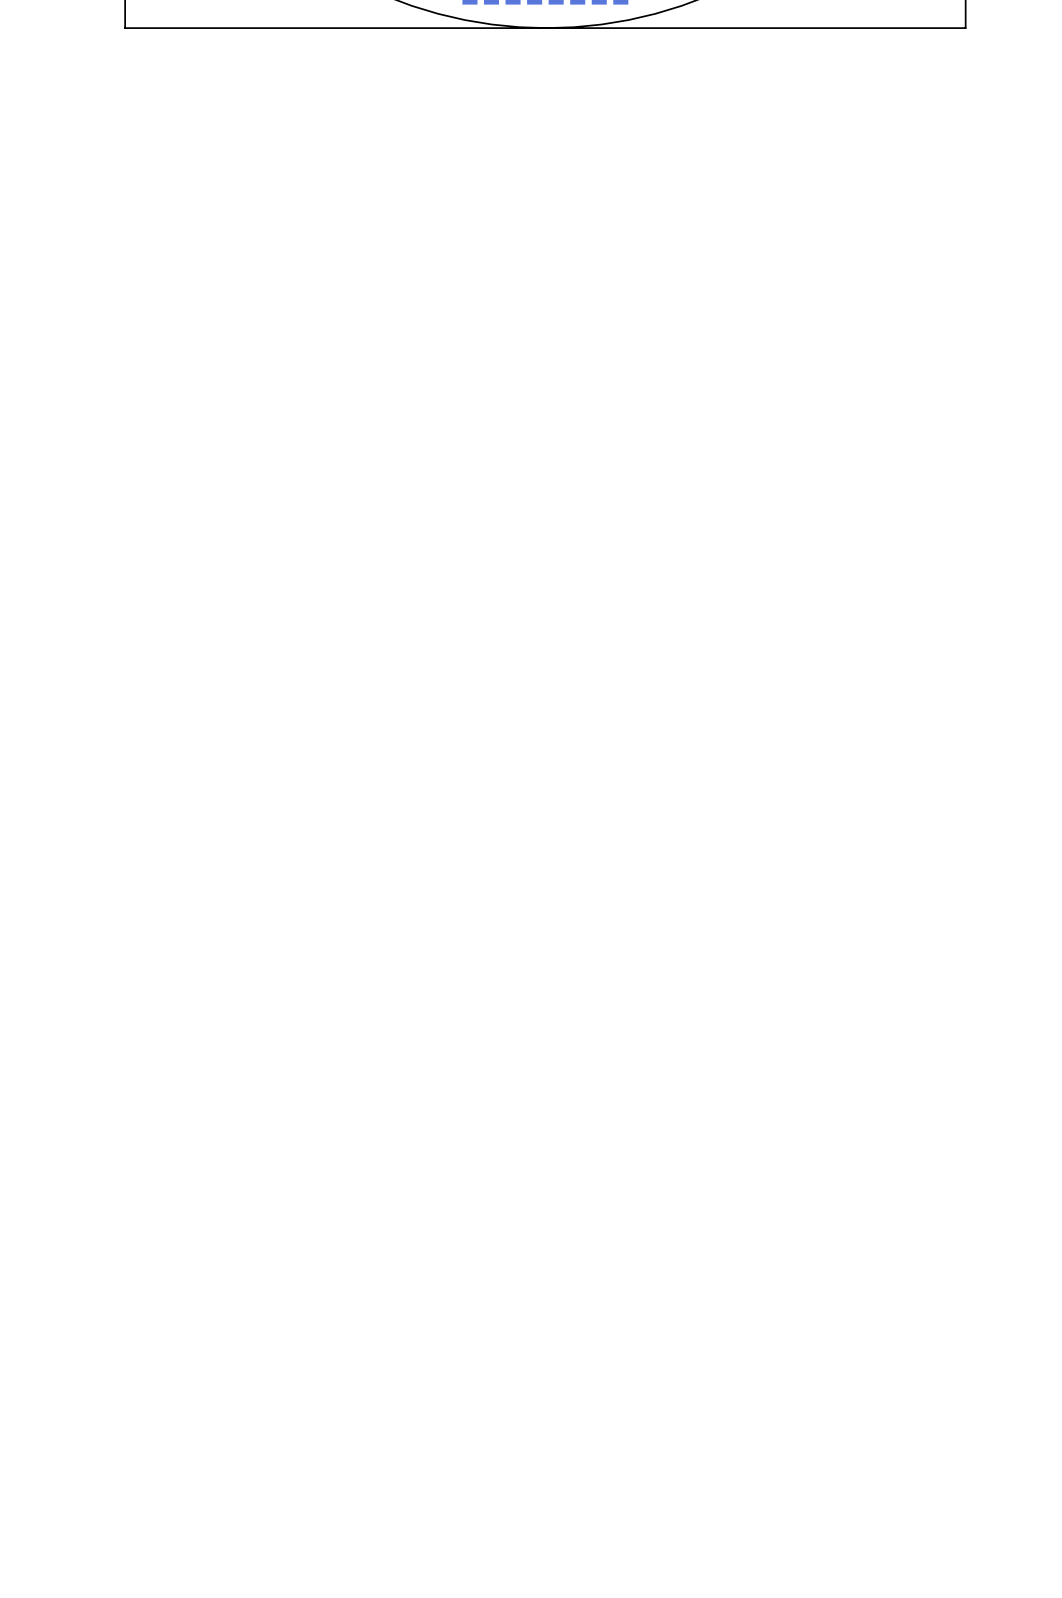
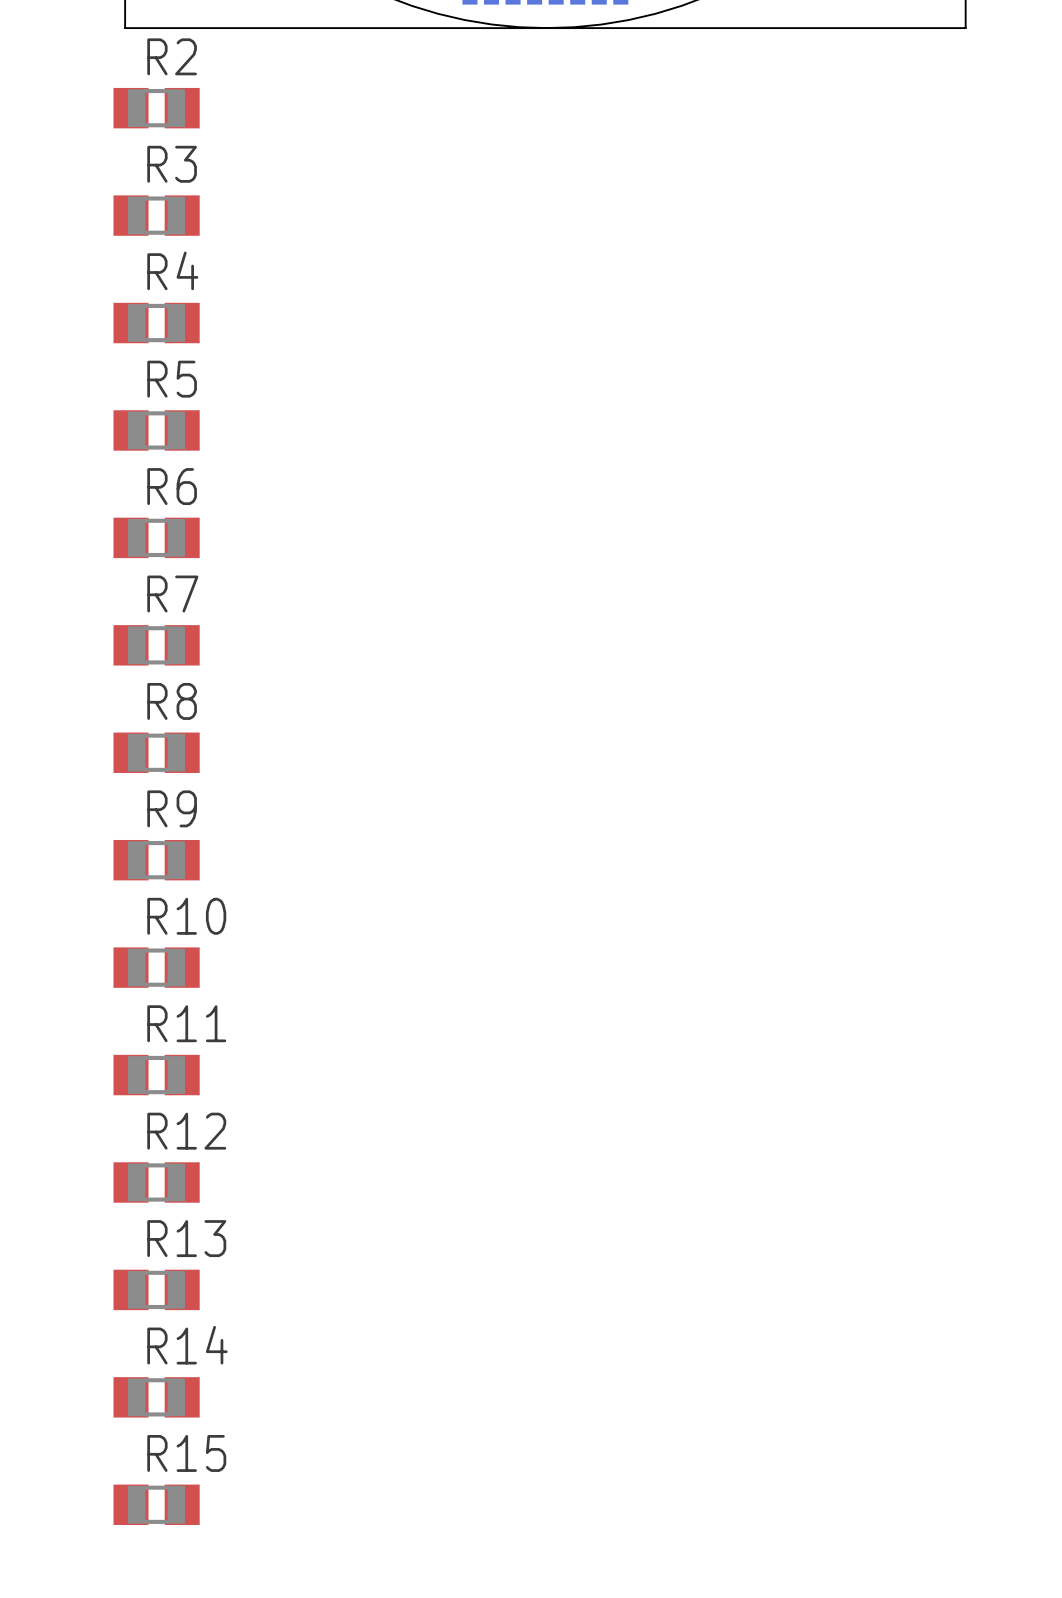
R2: none -> (156, 108)
R3: none -> (156, 215)
R4: none -> (156, 323)
R5: none -> (156, 430)
R6: none -> (156, 537)
R7: none -> (156, 645)
R8: none -> (156, 752)
R9: none -> (156, 860)
R10: none -> (156, 967)
R11: none -> (156, 1075)
R12: none -> (156, 1182)
R13: none -> (156, 1289)
R14: none -> (156, 1397)
R15: none -> (156, 1504)

